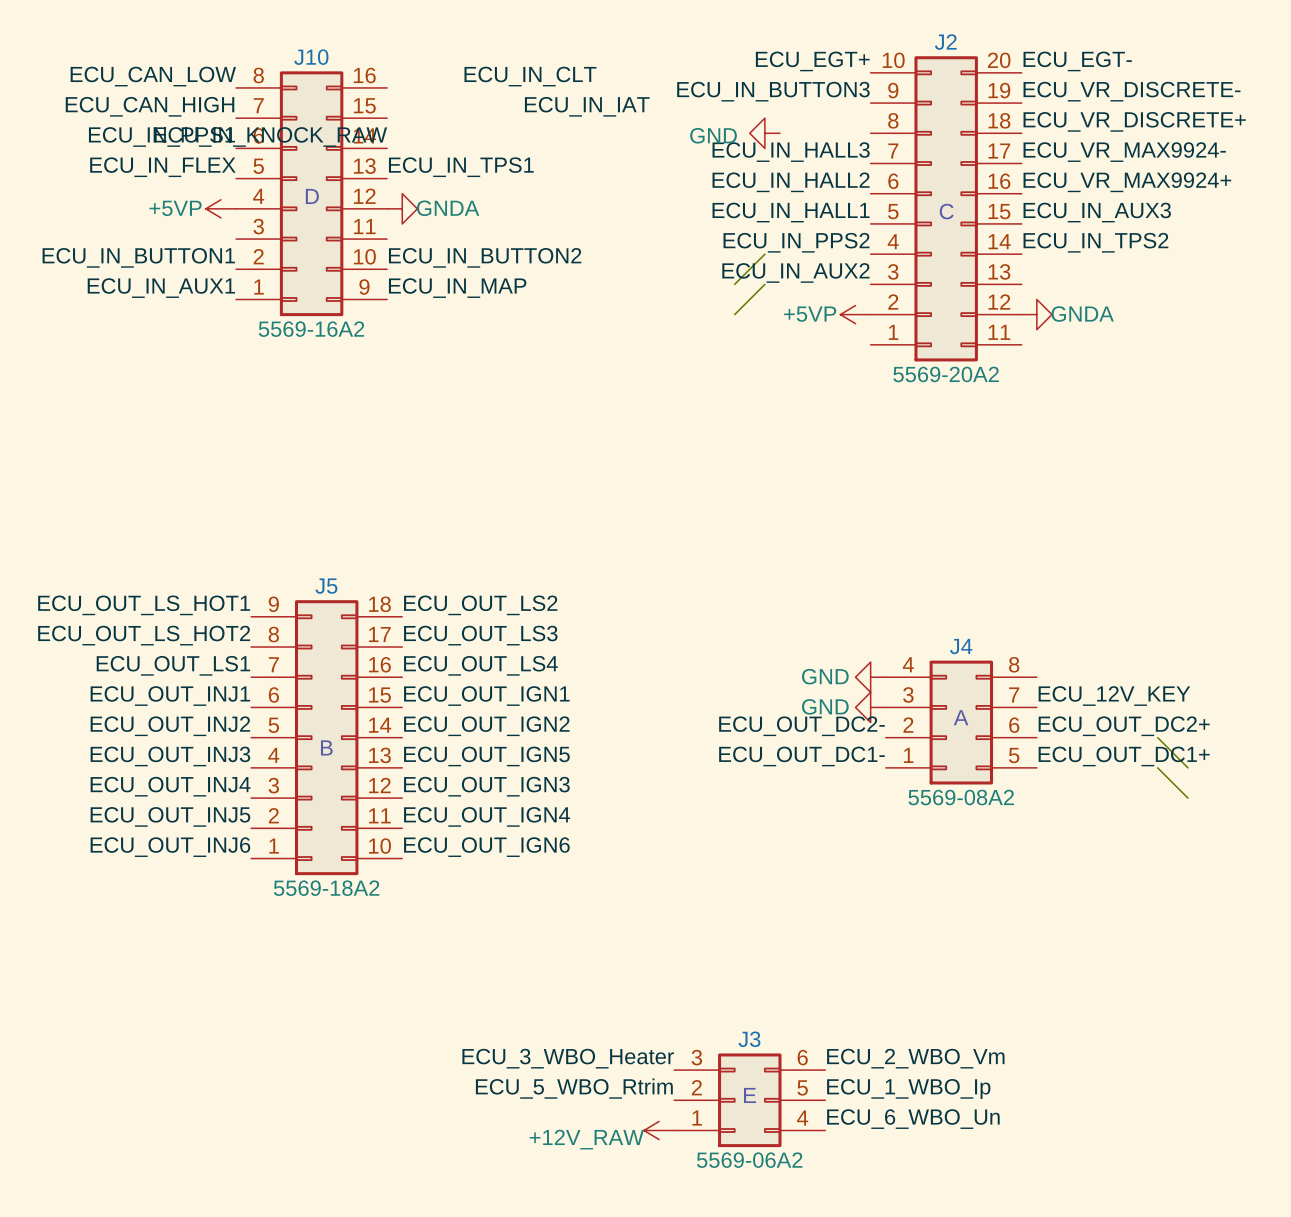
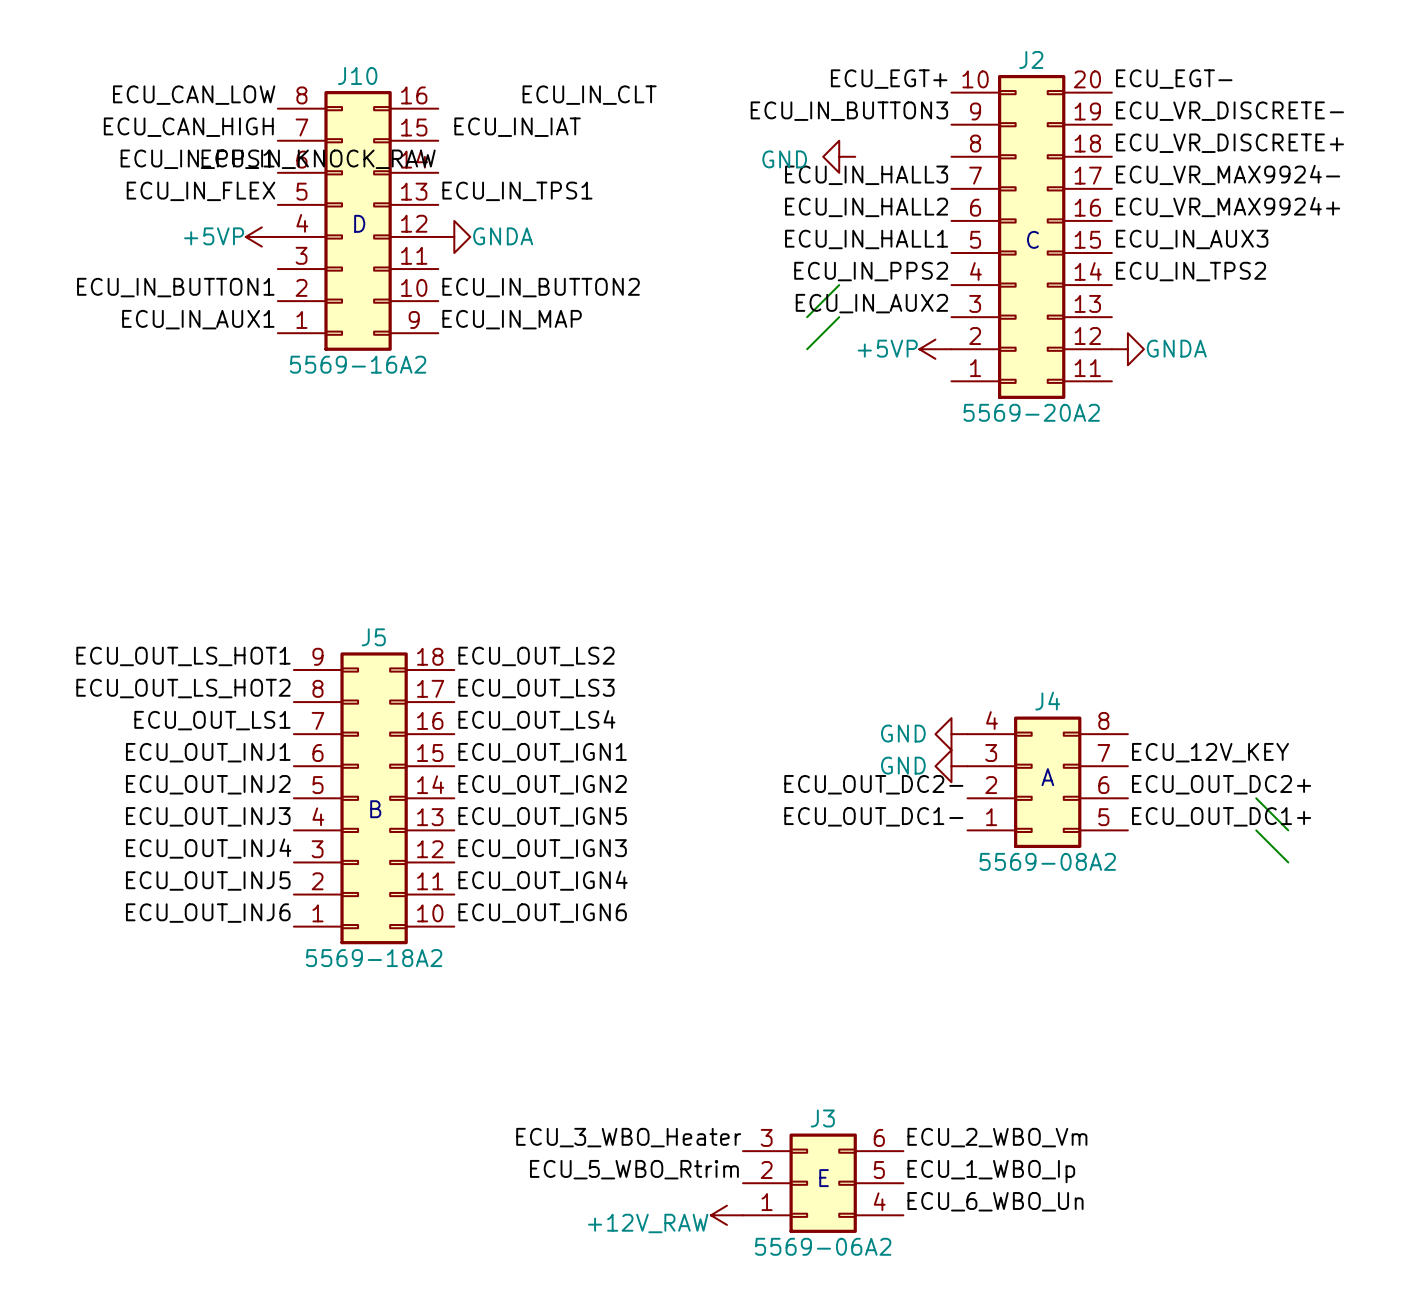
label position: ECU_IN_IAT (587, 106) -> ECU_IN_IAT (517, 127)

